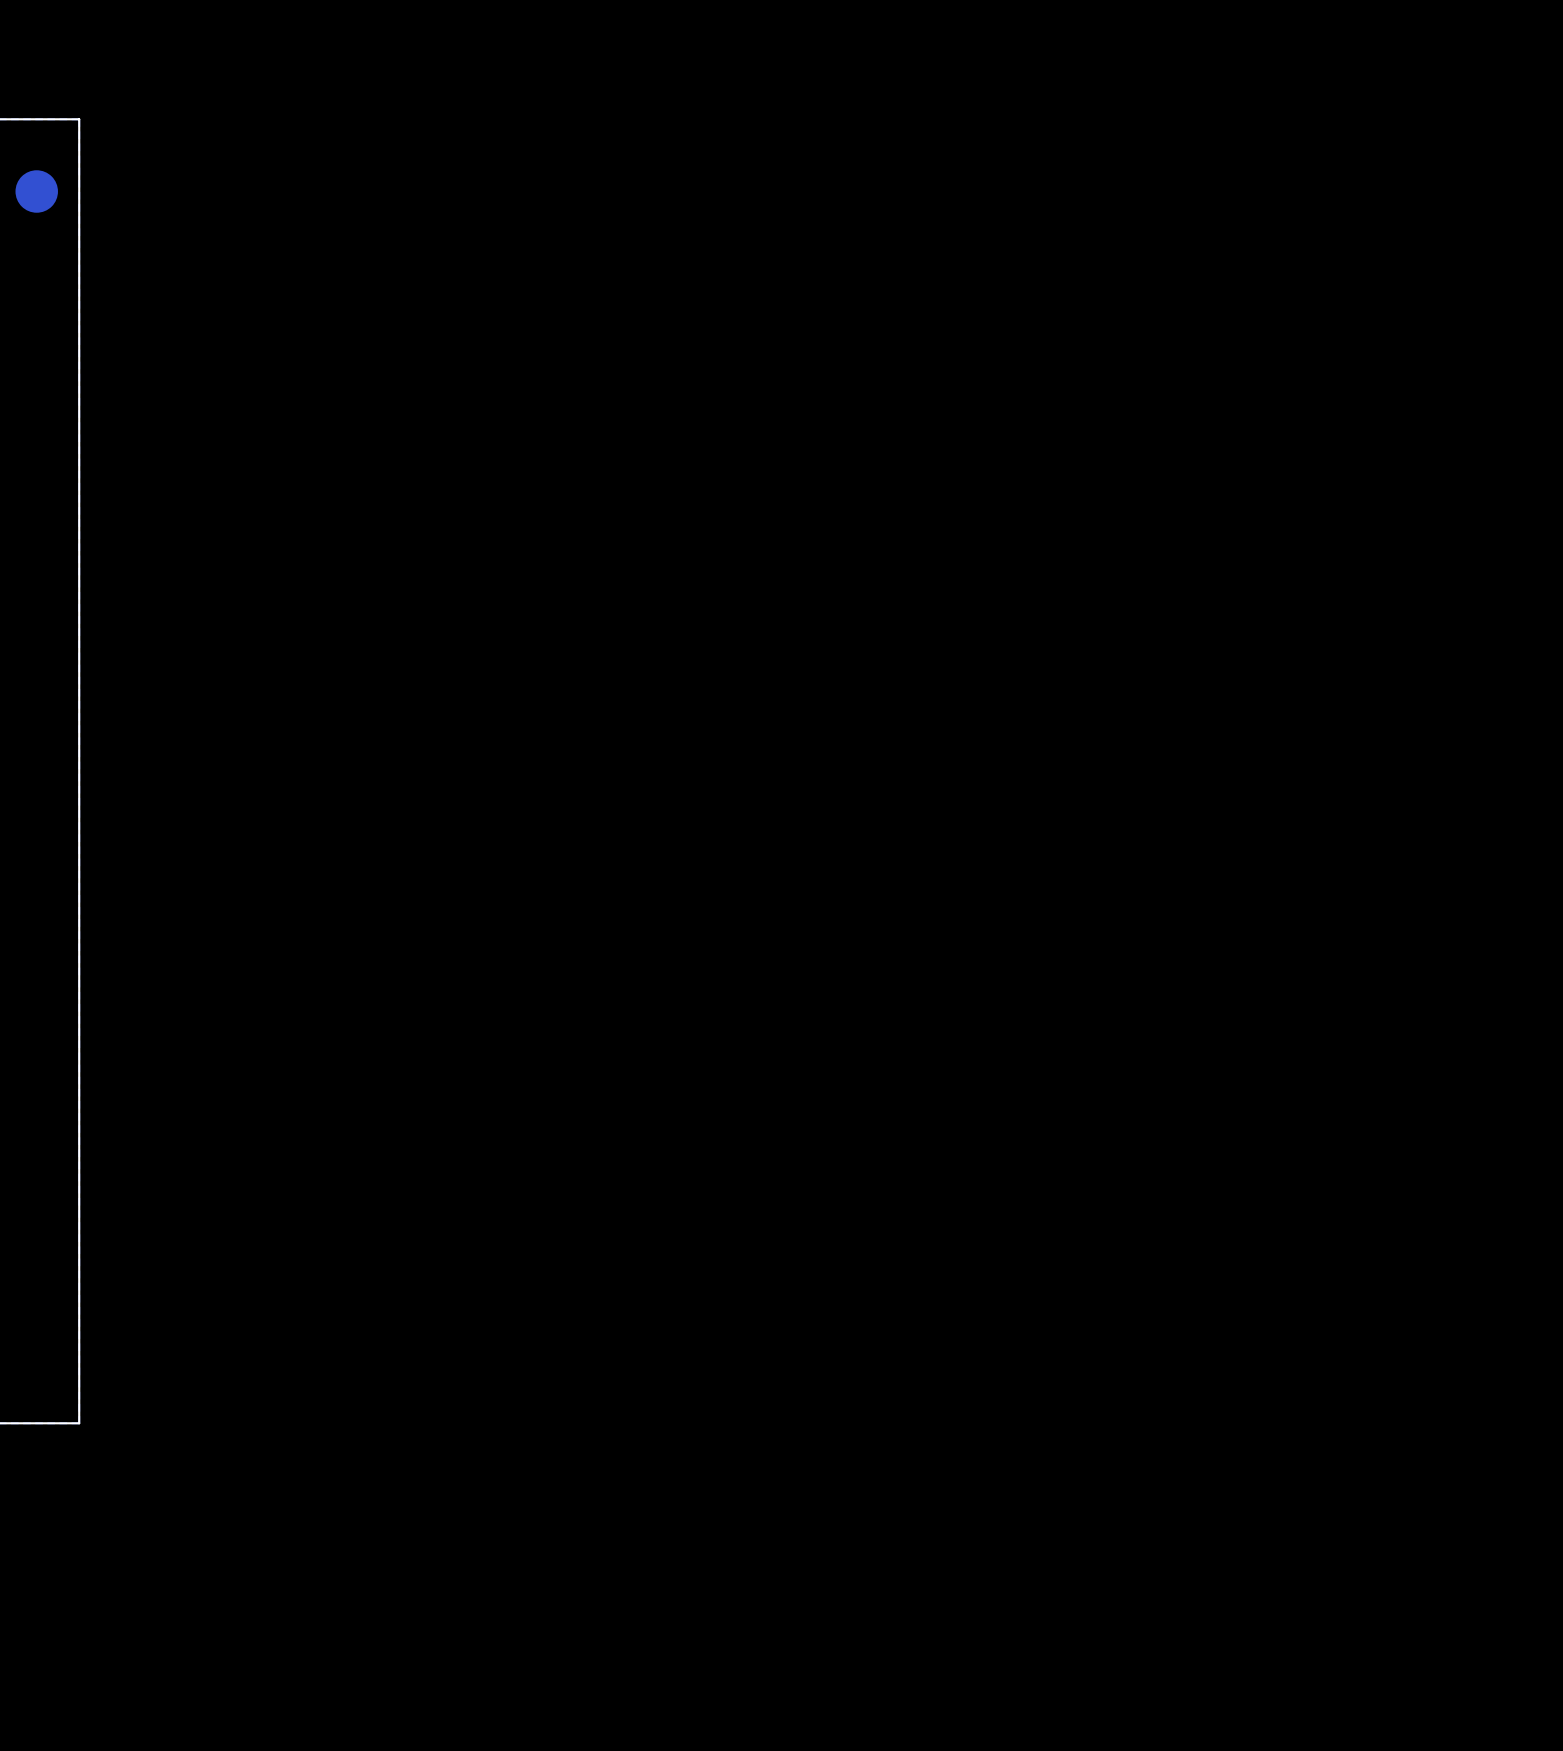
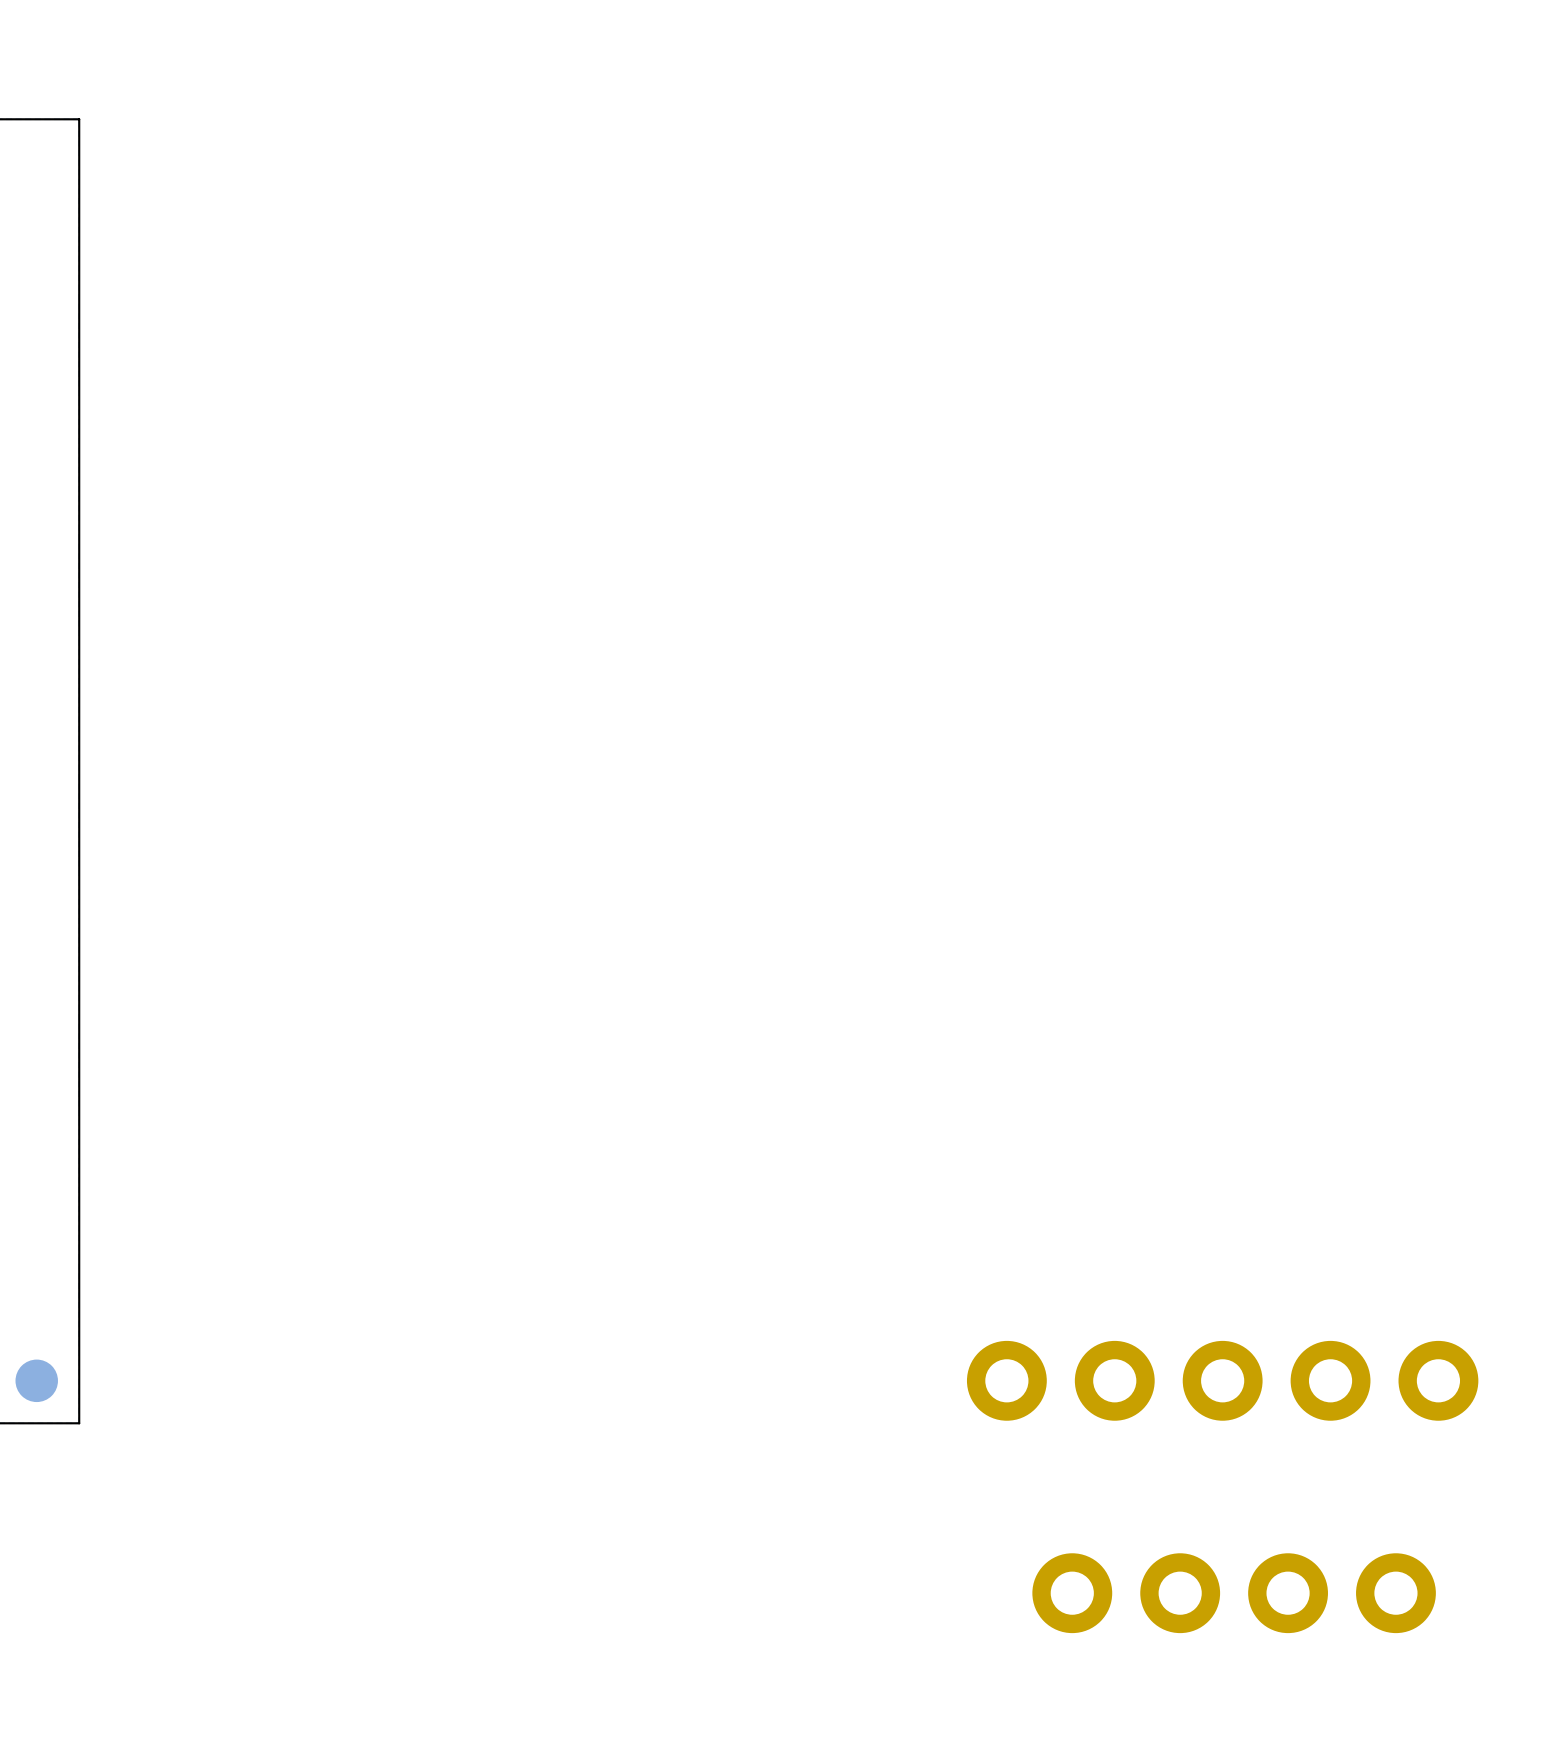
part: (36, 191) -> none
part: none -> (36, 1380)
part: none -> (1222, 1380)
part: none -> (1234, 1593)

